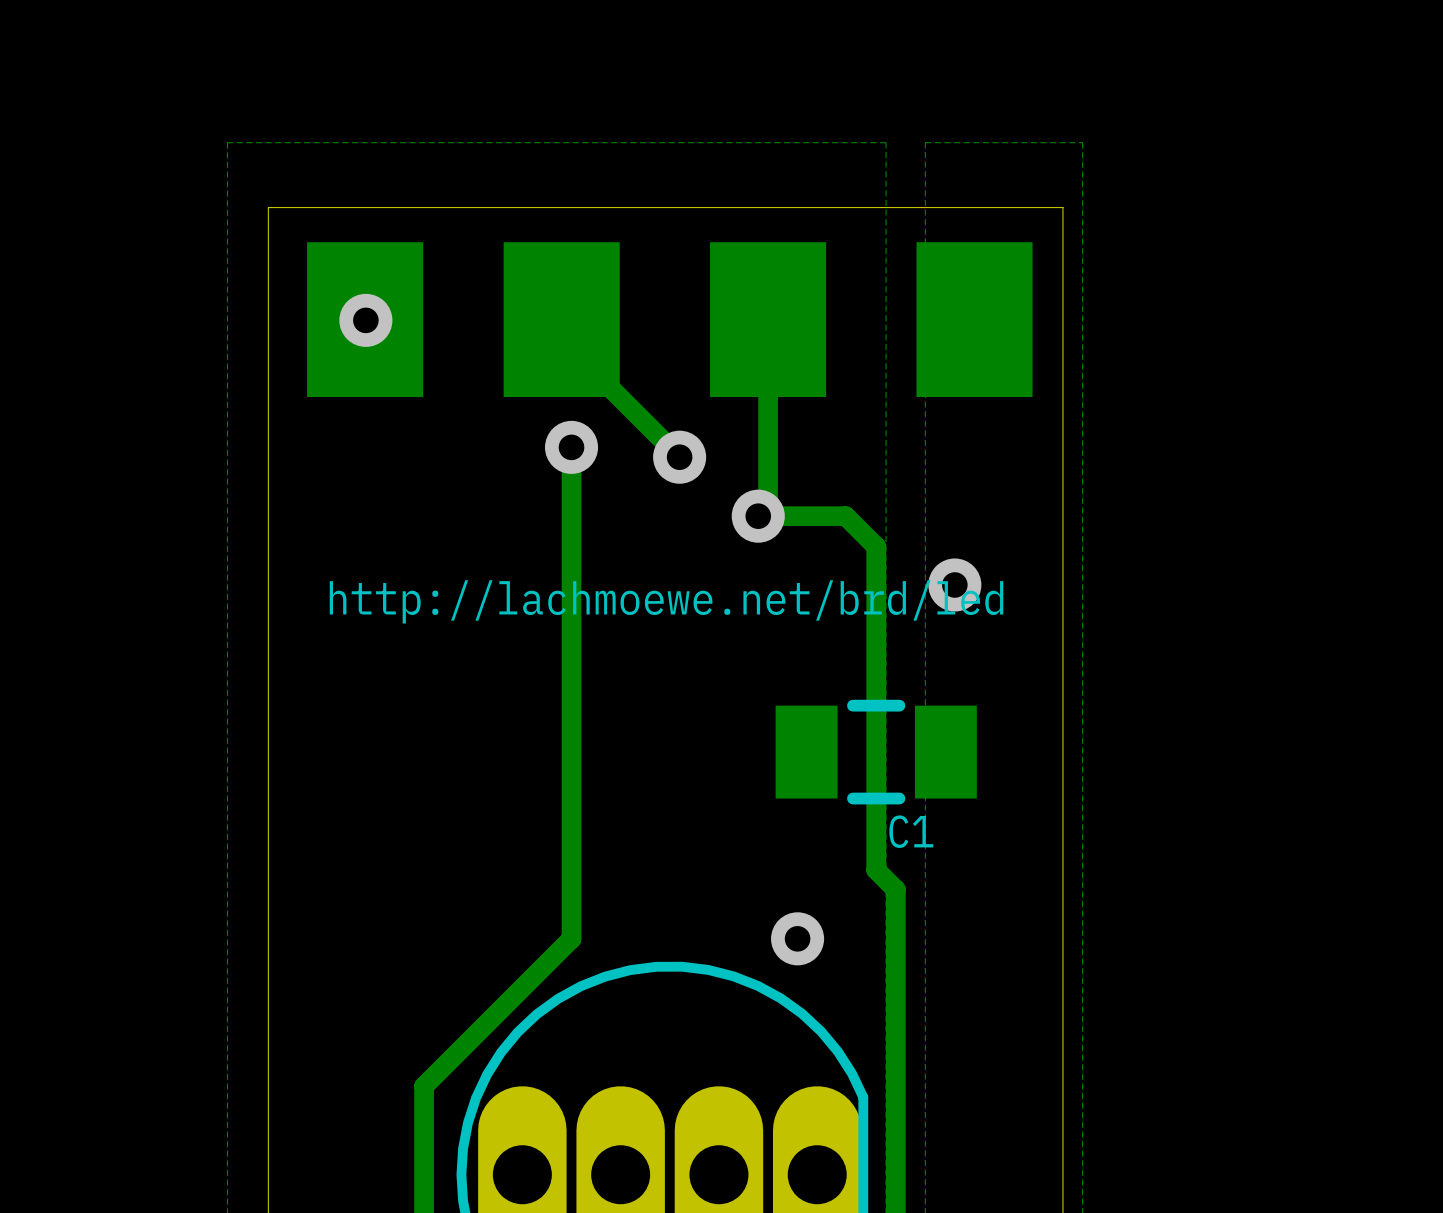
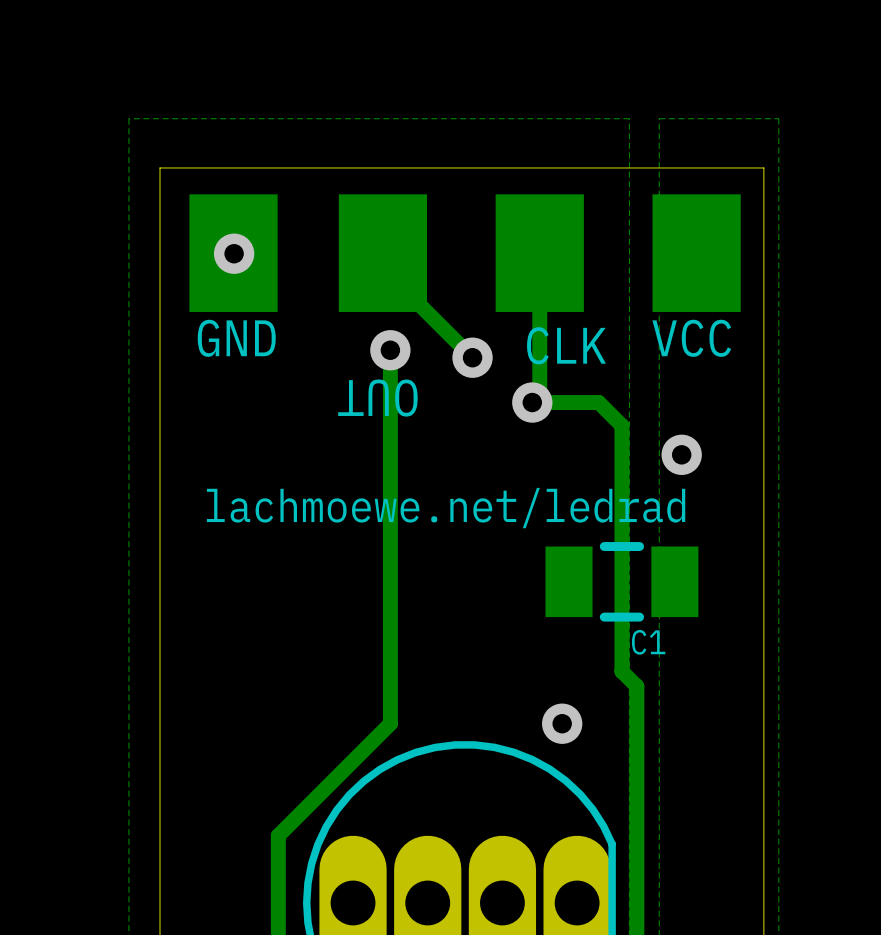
text: none -> GND (236, 338)
text: none -> VCC (691, 338)
text: none -> CLK (566, 345)
text: none -> OUT (377, 398)
text: http://lachmoewe.net/brd/led (666, 601) -> lachmoewe.net/ledrad (446, 508)

